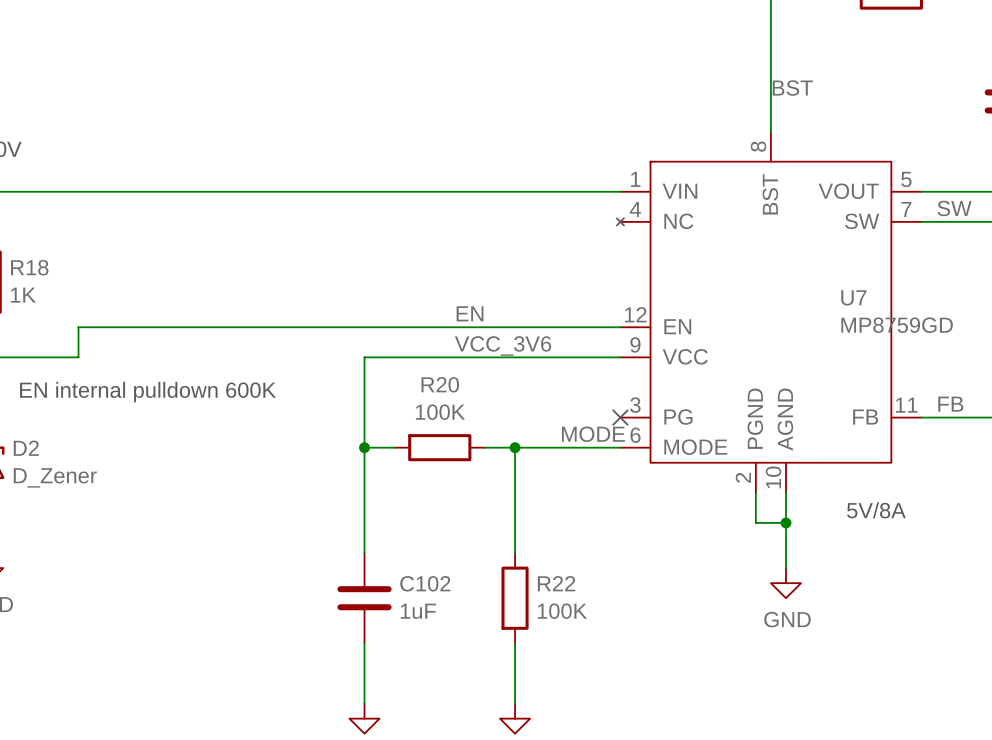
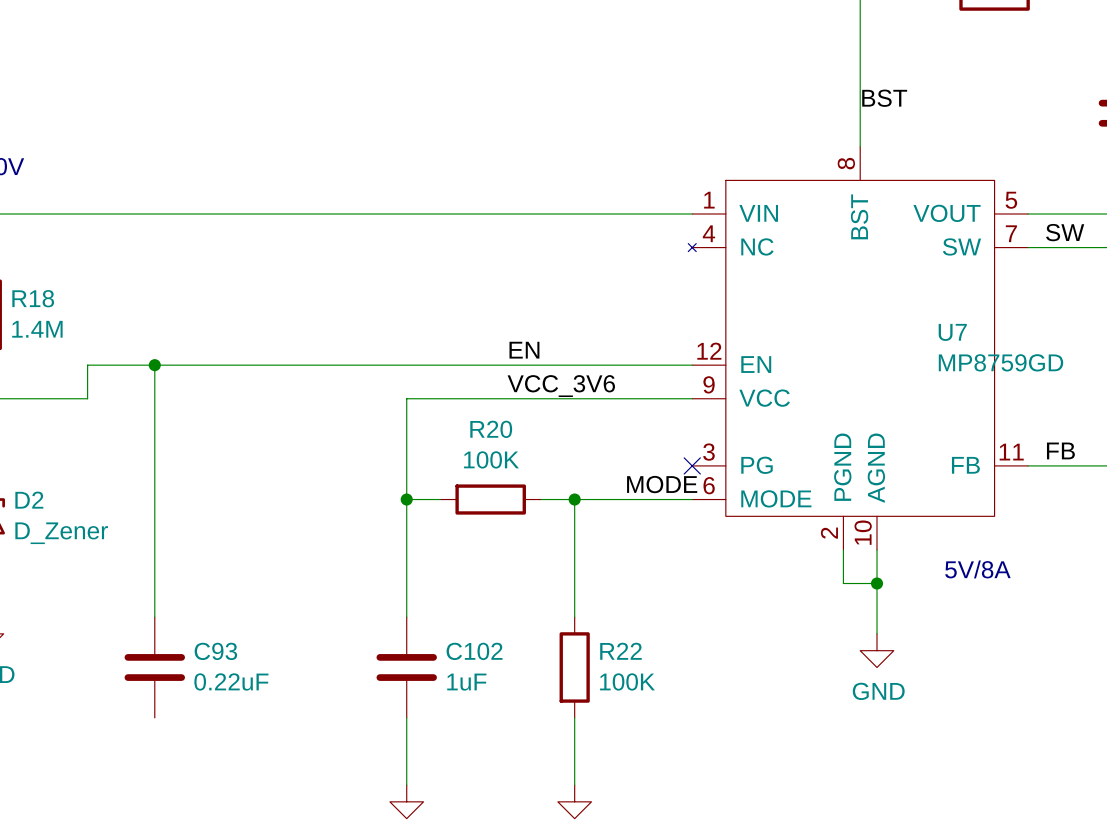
R18 value: 1K (23, 295) -> 1.4M (37, 329)
wire: none -> (154, 365) (154, 617)
junction: none -> (154, 365)
text: EN internal pulldown 600K (148, 392) -> none
C93: none -> 0.22uF (154, 667)

